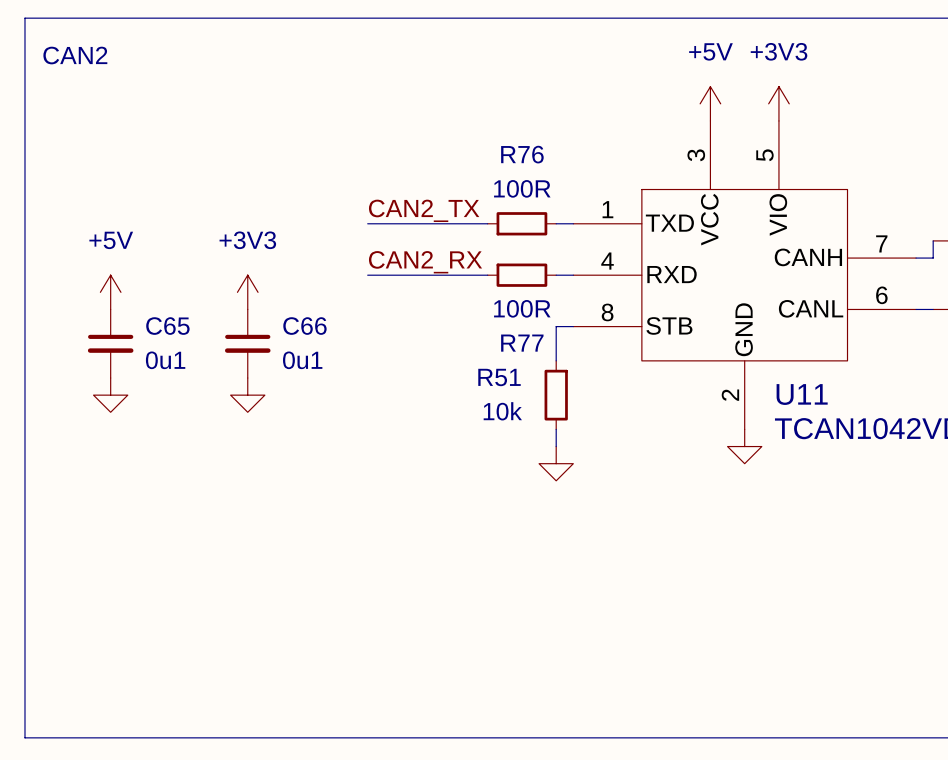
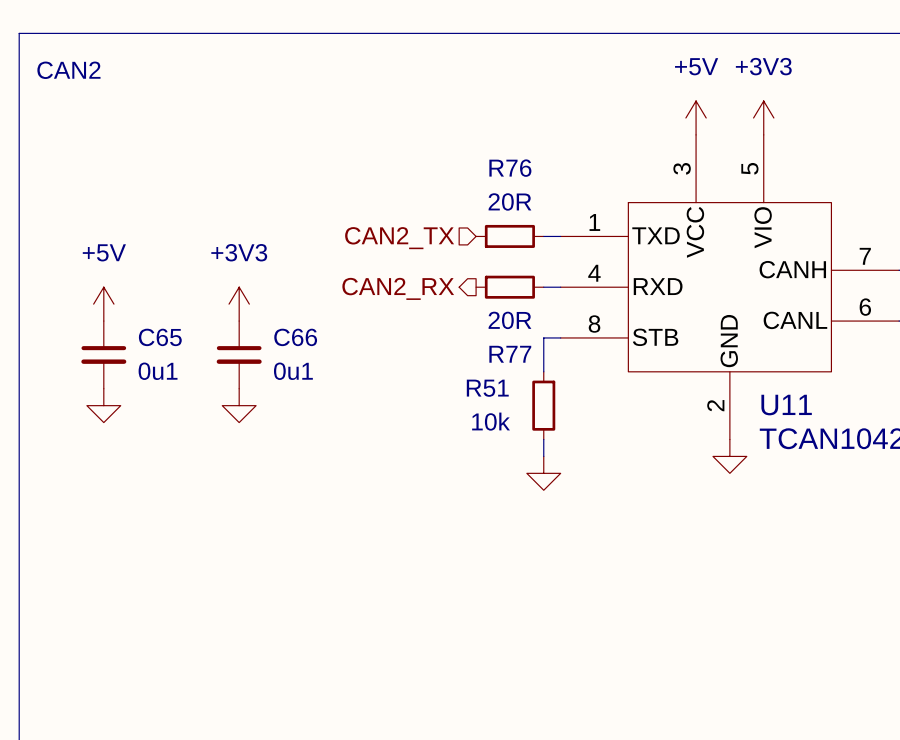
R76 value: 100R (522, 188) -> 20R (509, 201)
label: CAN2_TX (424, 210) -> none
wire: (367, 223) (487, 223) -> none
hierarchical label: none -> CAN2_TX (399, 238)
label: CAN2_RX (425, 262) -> none
wire: (367, 275) (487, 275) -> none
hierarchical label: none -> CAN2_RX (398, 288)
R77 value: 100R (522, 308) -> 20R (509, 320)

